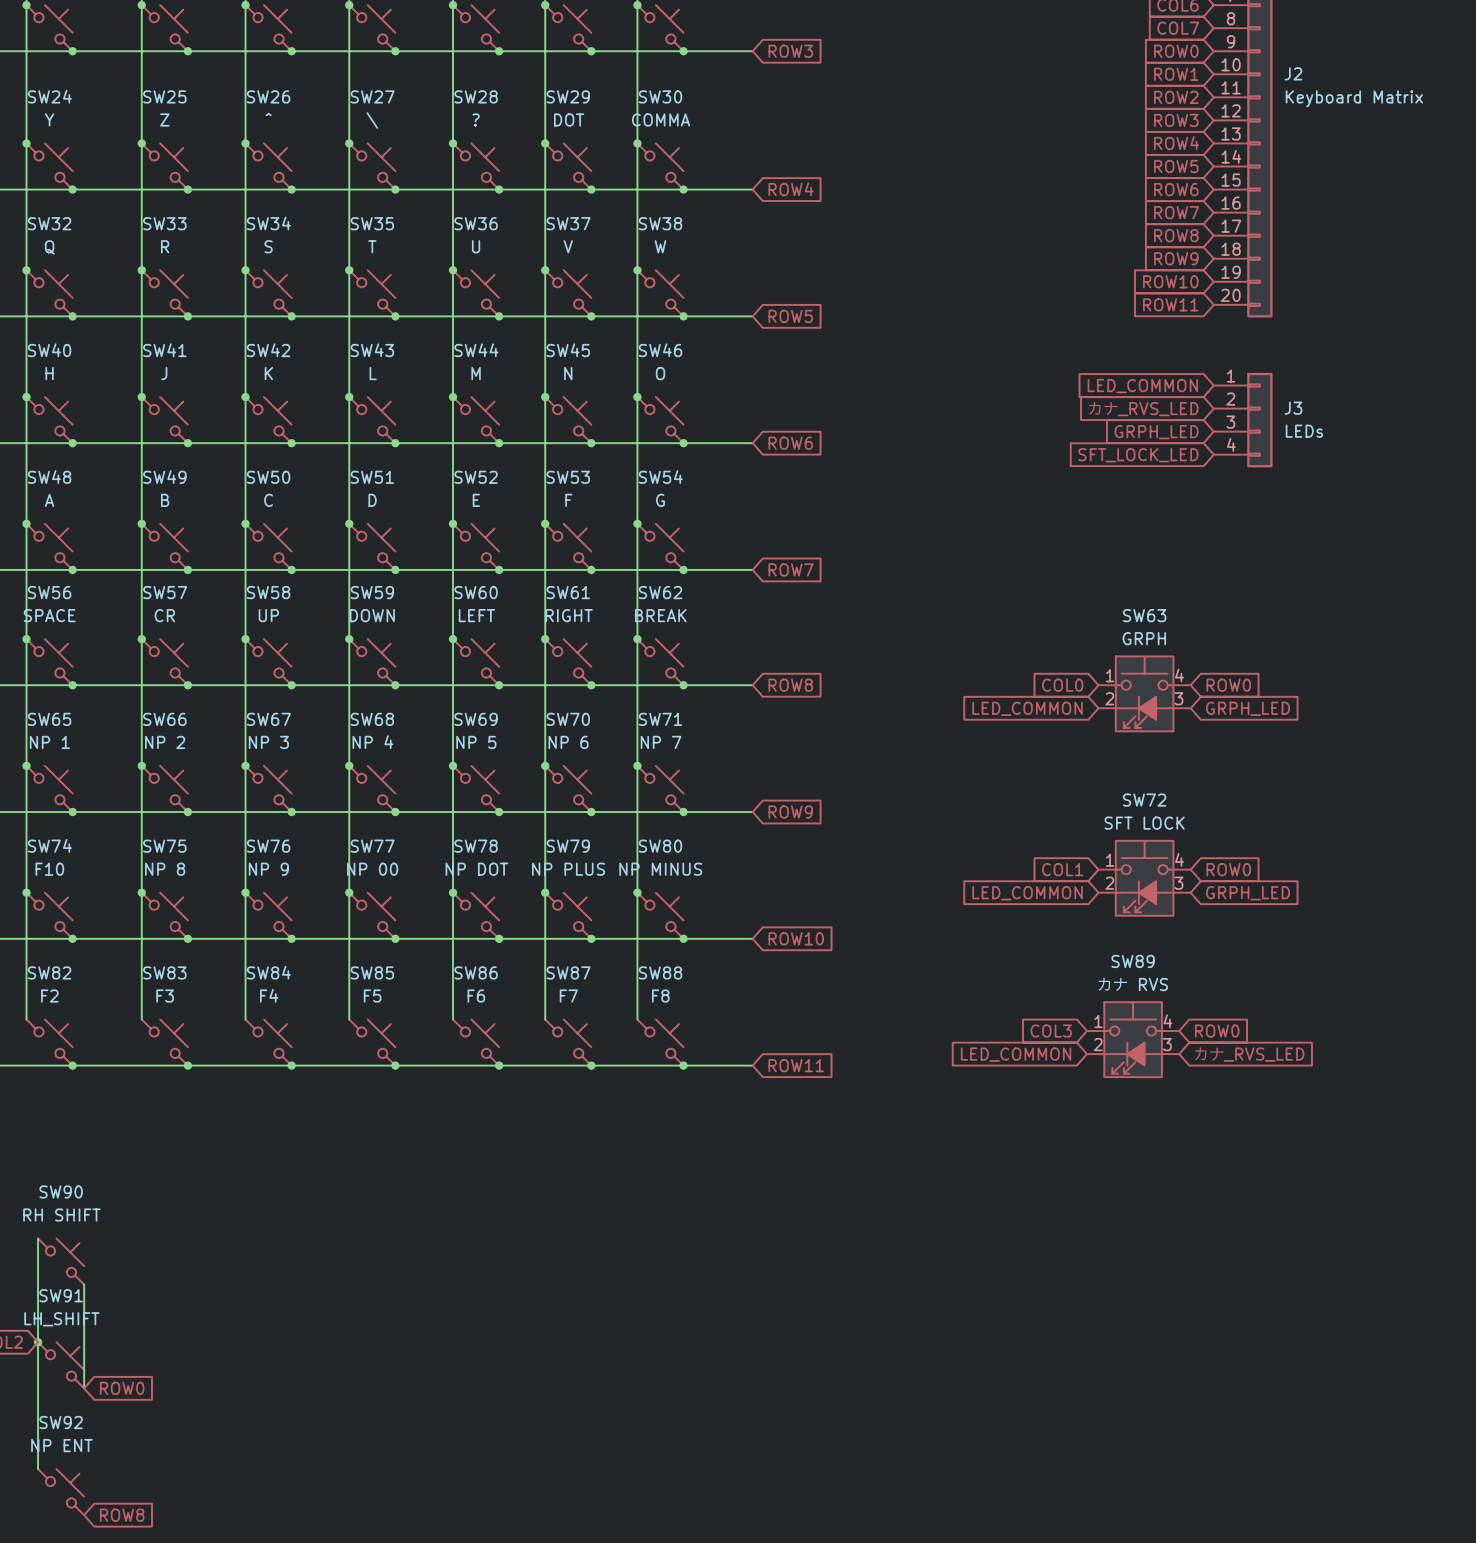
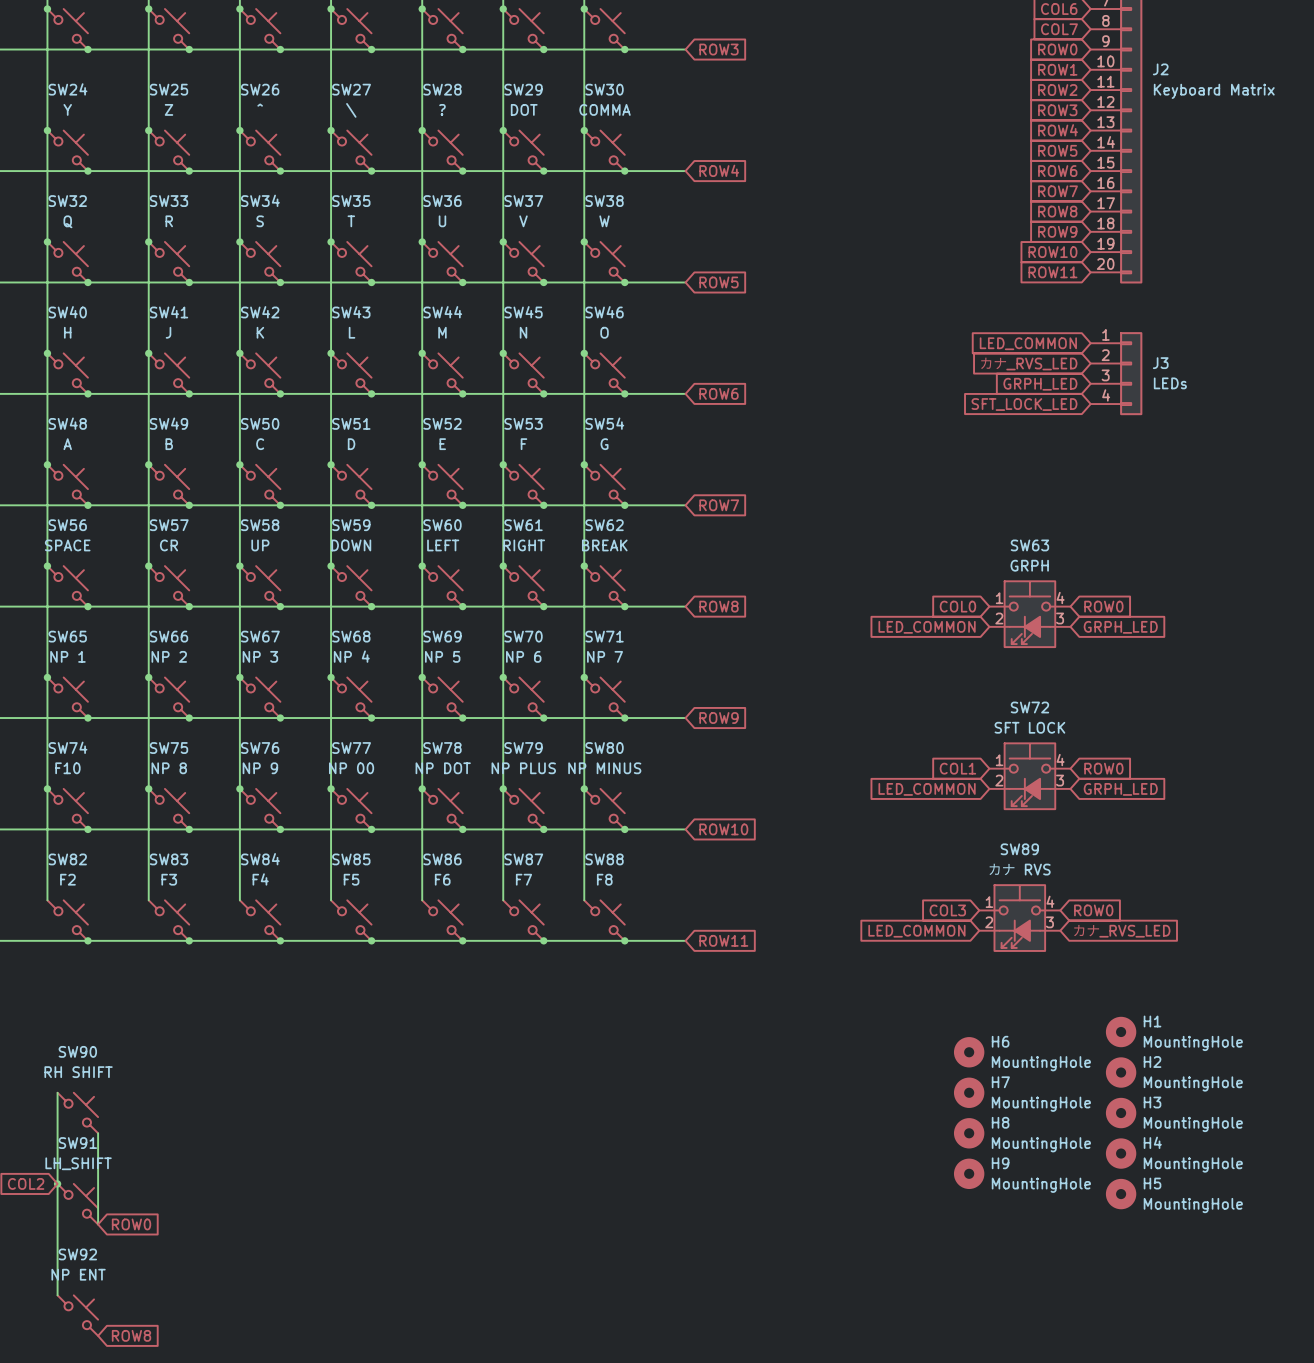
H1: none -> MountingHole (1121, 1032)
H6: none -> MountingHole (969, 1052)
H2: none -> MountingHole (1121, 1072)
H7: none -> MountingHole (969, 1092)
H3: none -> MountingHole (1121, 1113)
H8: none -> MountingHole (969, 1133)
H4: none -> MountingHole (1121, 1153)
H9: none -> MountingHole (969, 1173)
H5: none -> MountingHole (1121, 1194)

